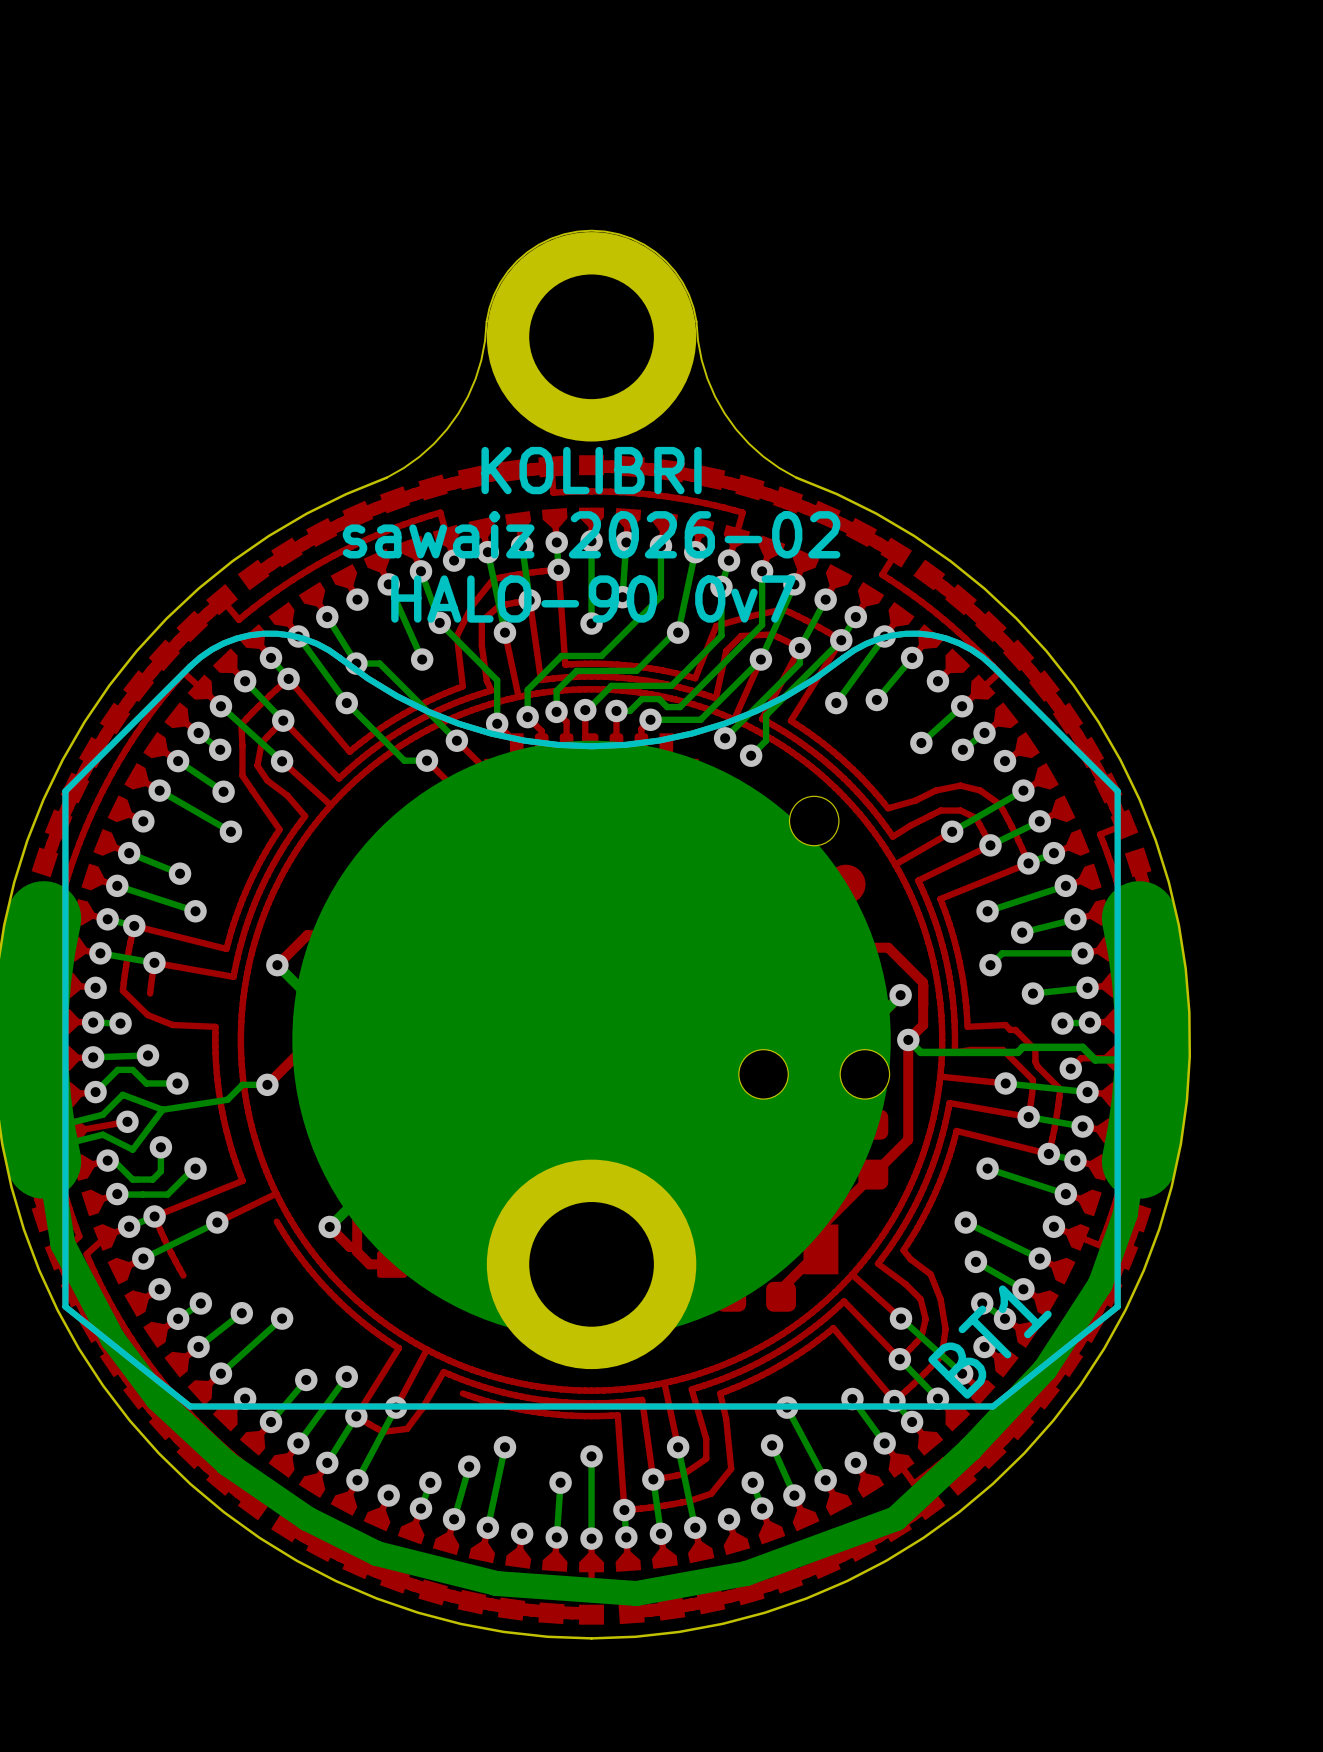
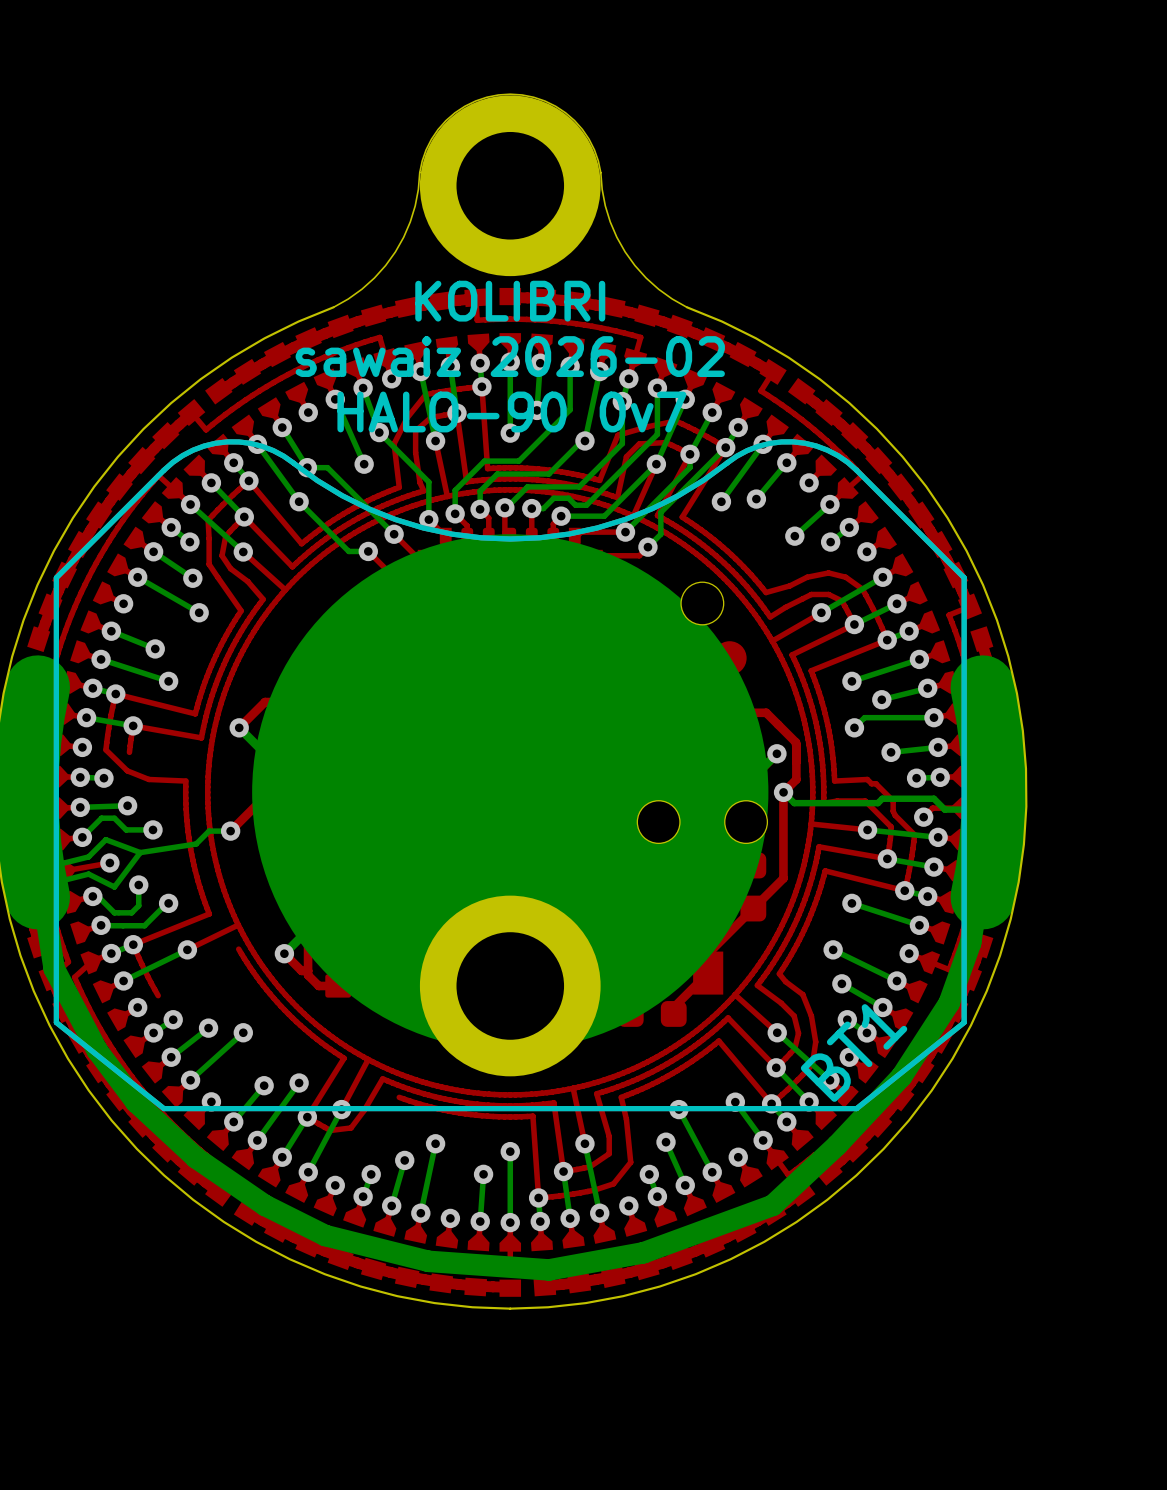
top track: none -> (625, 532) (581, 532) (574, 538)
top track: none -> (647, 547) (639, 555) (592, 555)

